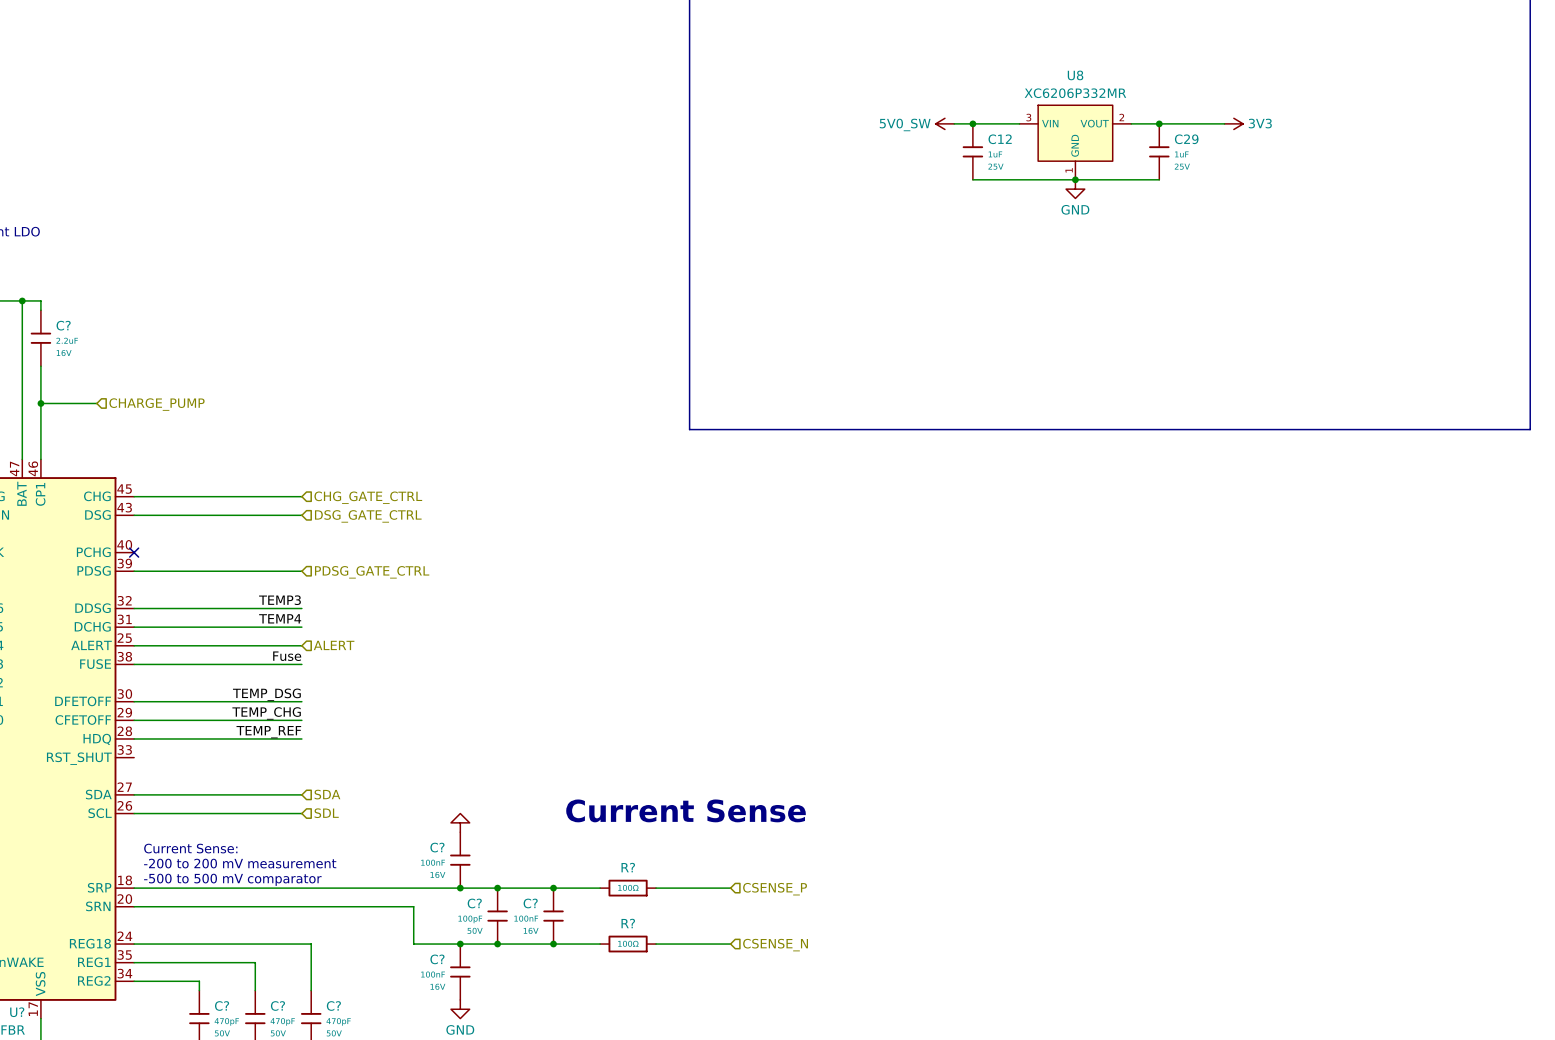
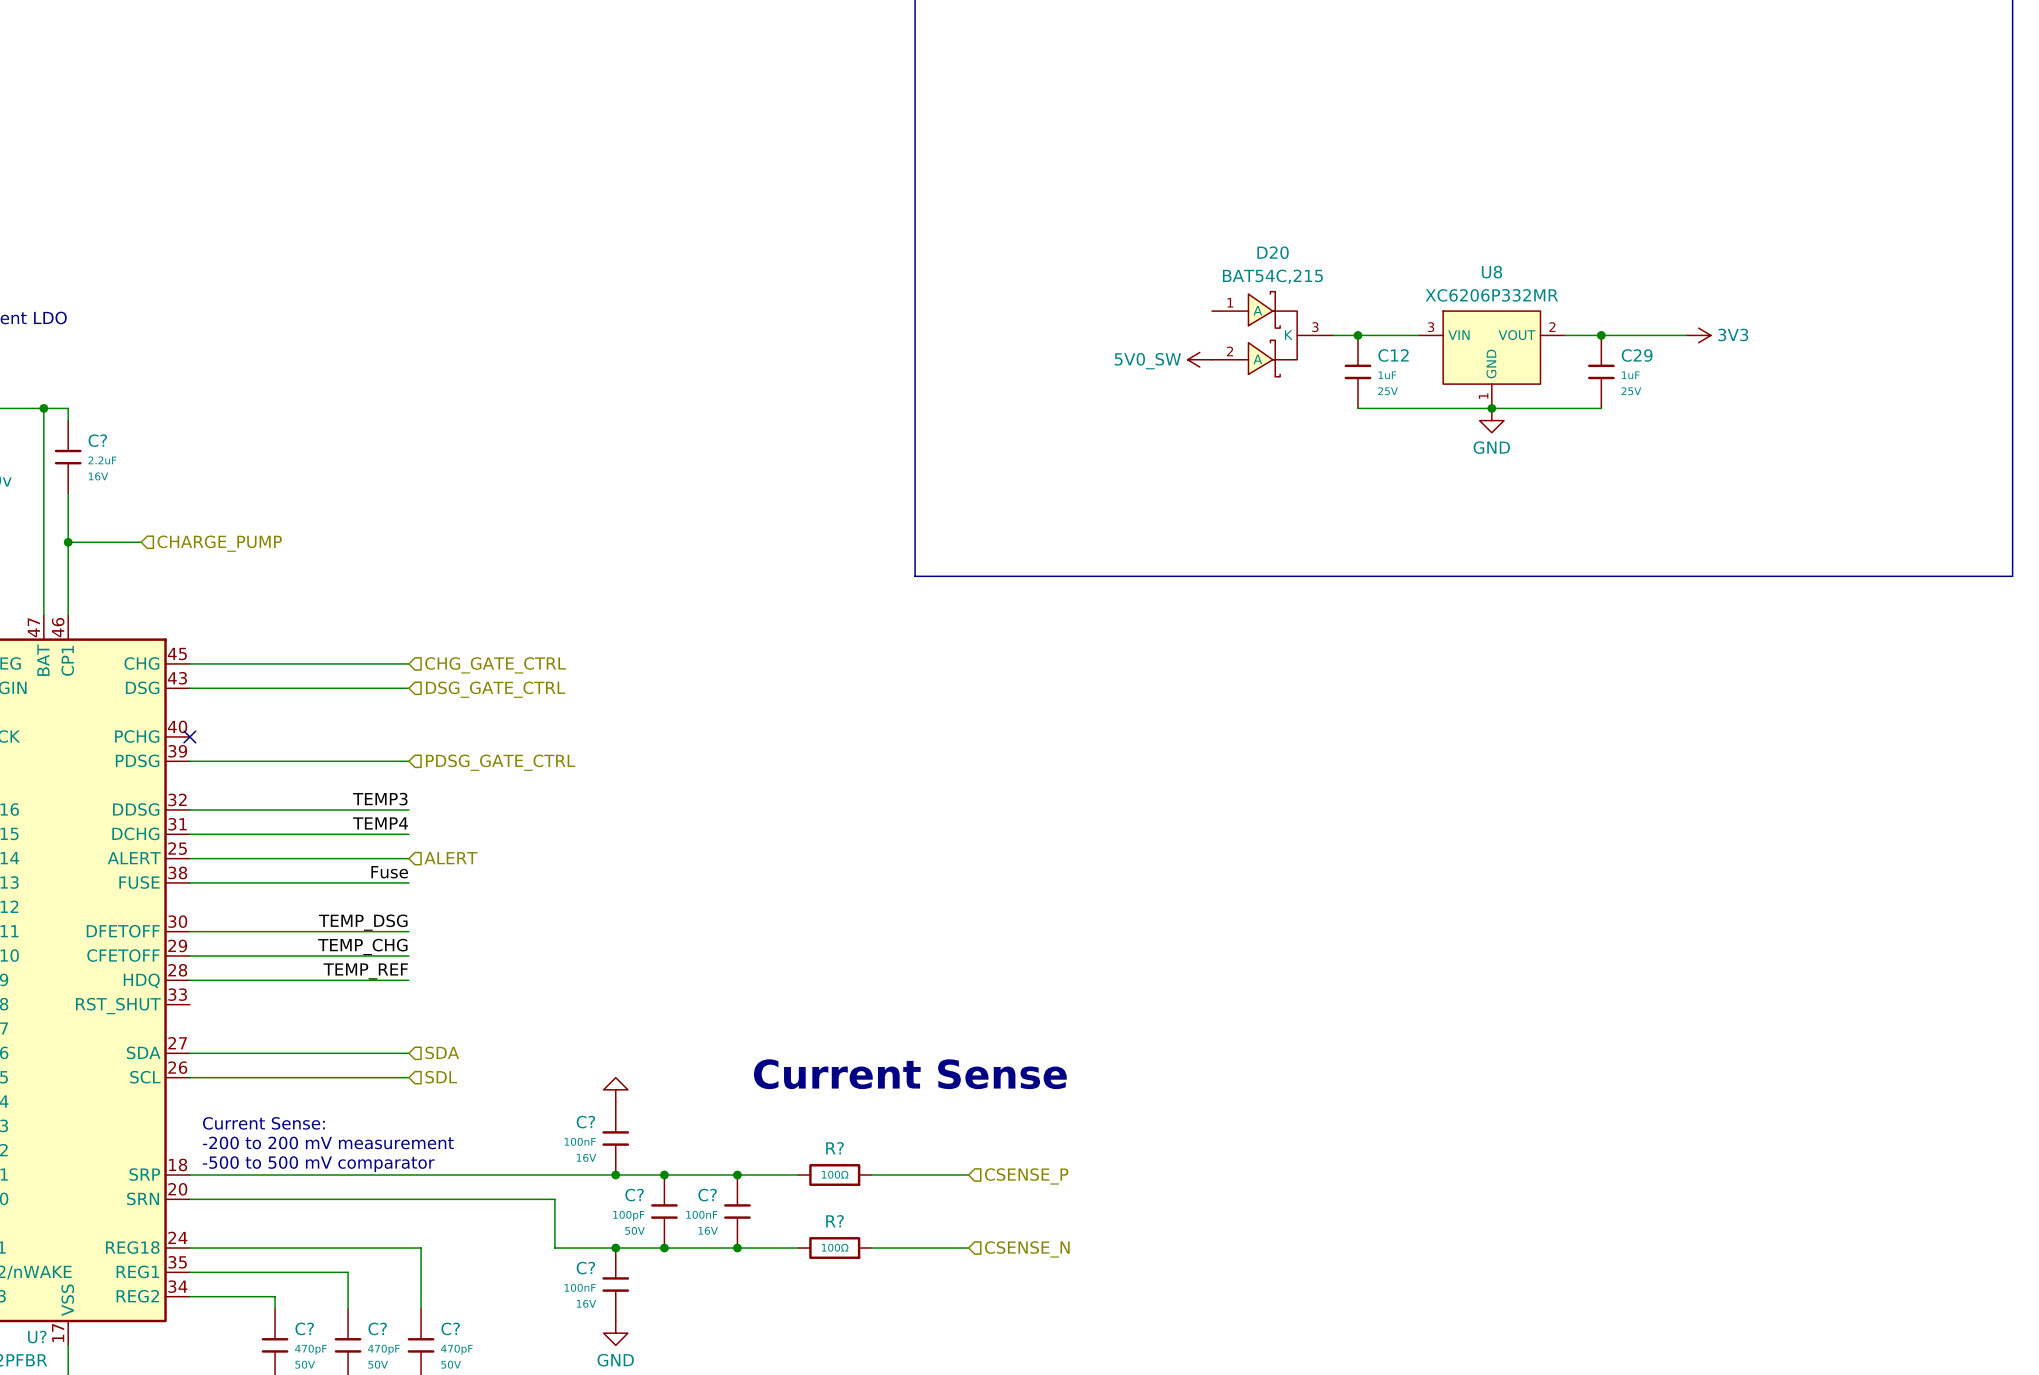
power symbol position: 5V0_SW (944, 123) -> 5V0_SW (1199, 359)
wire: (954, 123) (1019, 123) -> (1333, 335) (1418, 335)
junction: (972, 123) -> none
wire: (1131, 123) (1224, 123) -> (1564, 335) (1686, 335)
junction: (1159, 123) -> none
power symbol position: 3V3 (1233, 123) -> 3V3 (1698, 335)
U8 position: (1075, 142) -> (1491, 359)
C12 position: (972, 151) -> (1357, 371)
C29 position: (1159, 151) -> (1601, 371)
wire: (972, 179) (1159, 179) -> (1357, 408) (1601, 408)
junction: (1075, 179) -> none
power symbol position: GND (1075, 189) -> GND (1491, 420)
D20: none -> BAT54C,215 (1272, 334)
junction: none -> (1357, 335)
junction: none -> (1601, 335)
junction: none -> (1491, 408)

